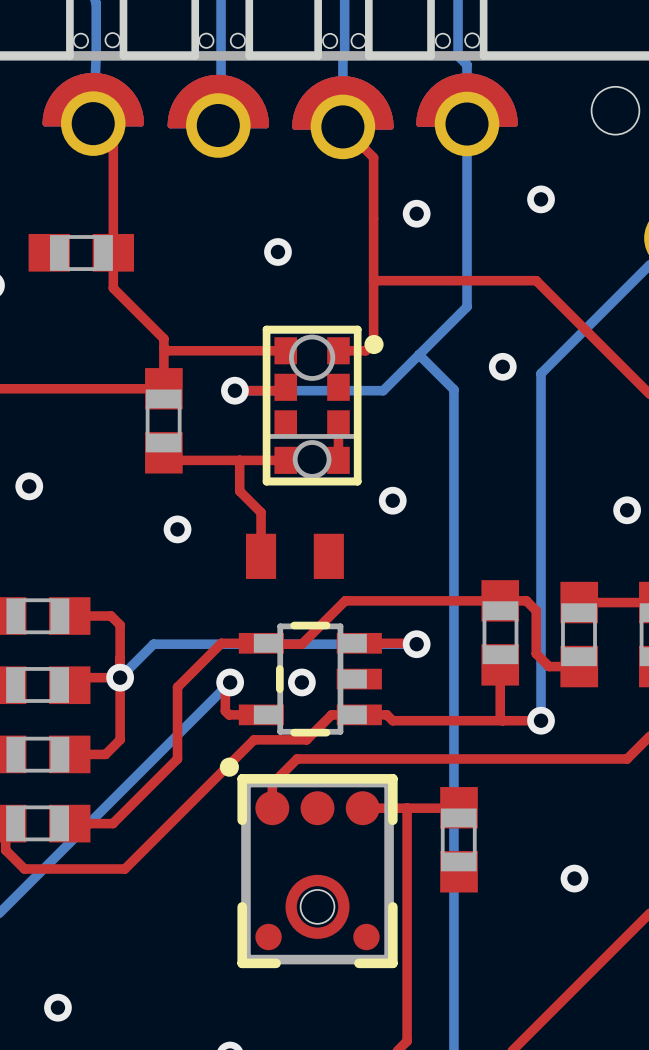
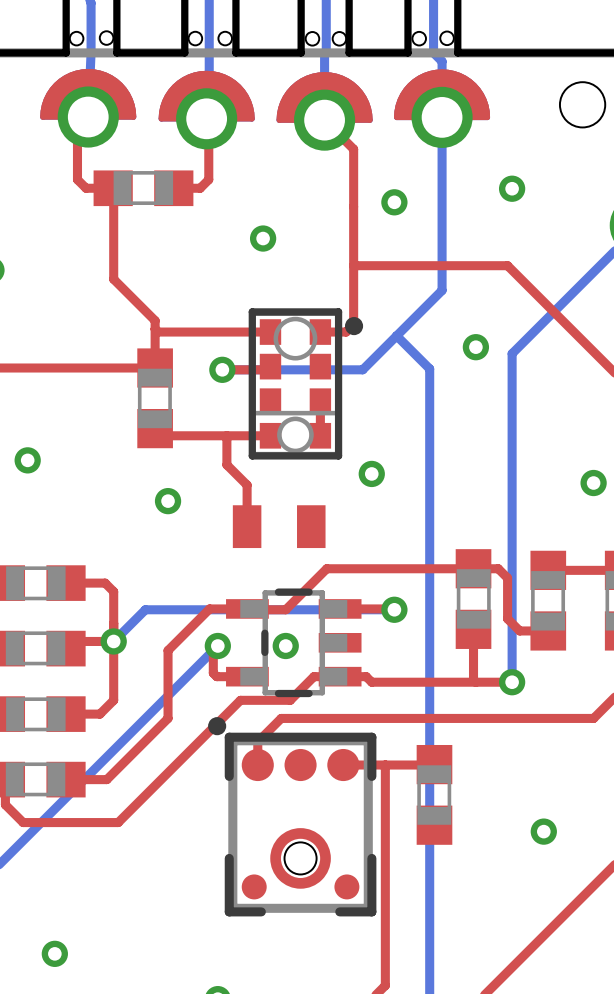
top track: (93, 123) (113, 143) (113, 288) (120, 295) -> (109, 188) (113, 192) (113, 279)
top track: none -> (88, 117) (77, 127) (77, 179) (86, 188) (113, 188)
top track: none -> (208, 120) (208, 179) (200, 188) (173, 188)
part position: (81, 252) -> (143, 188)

